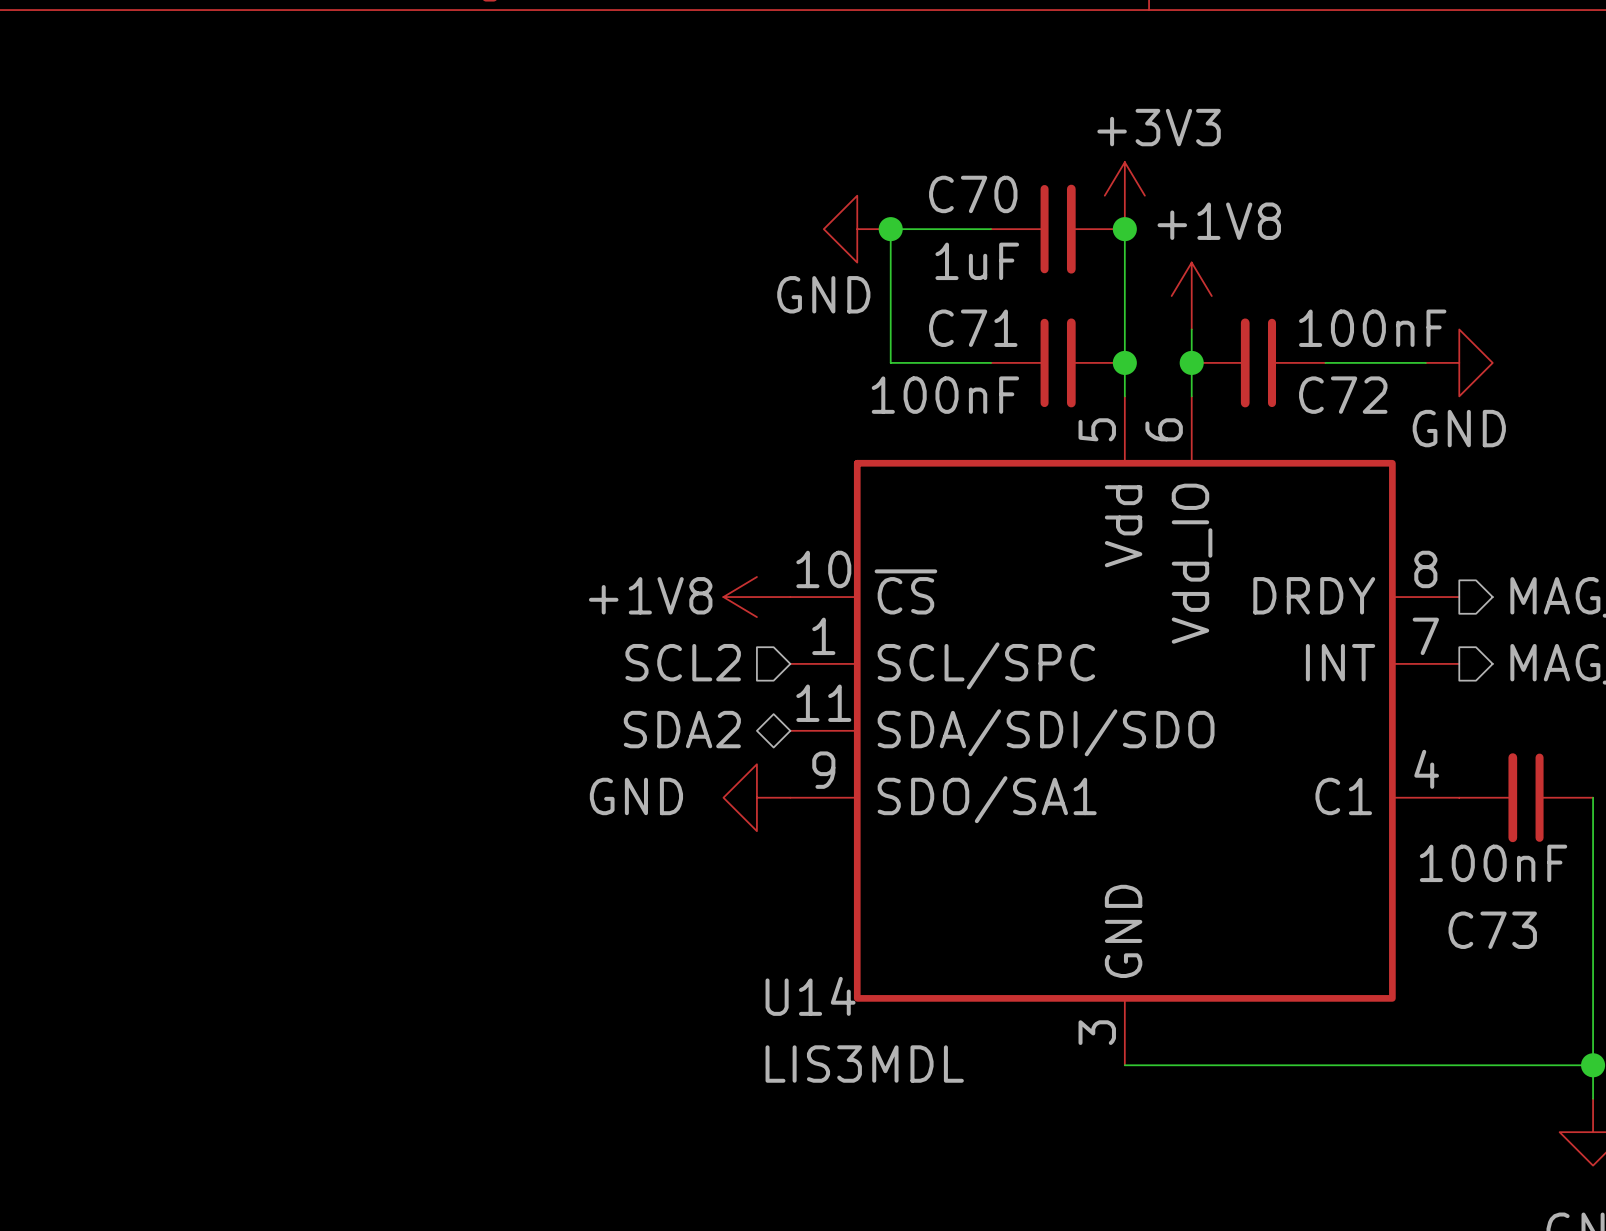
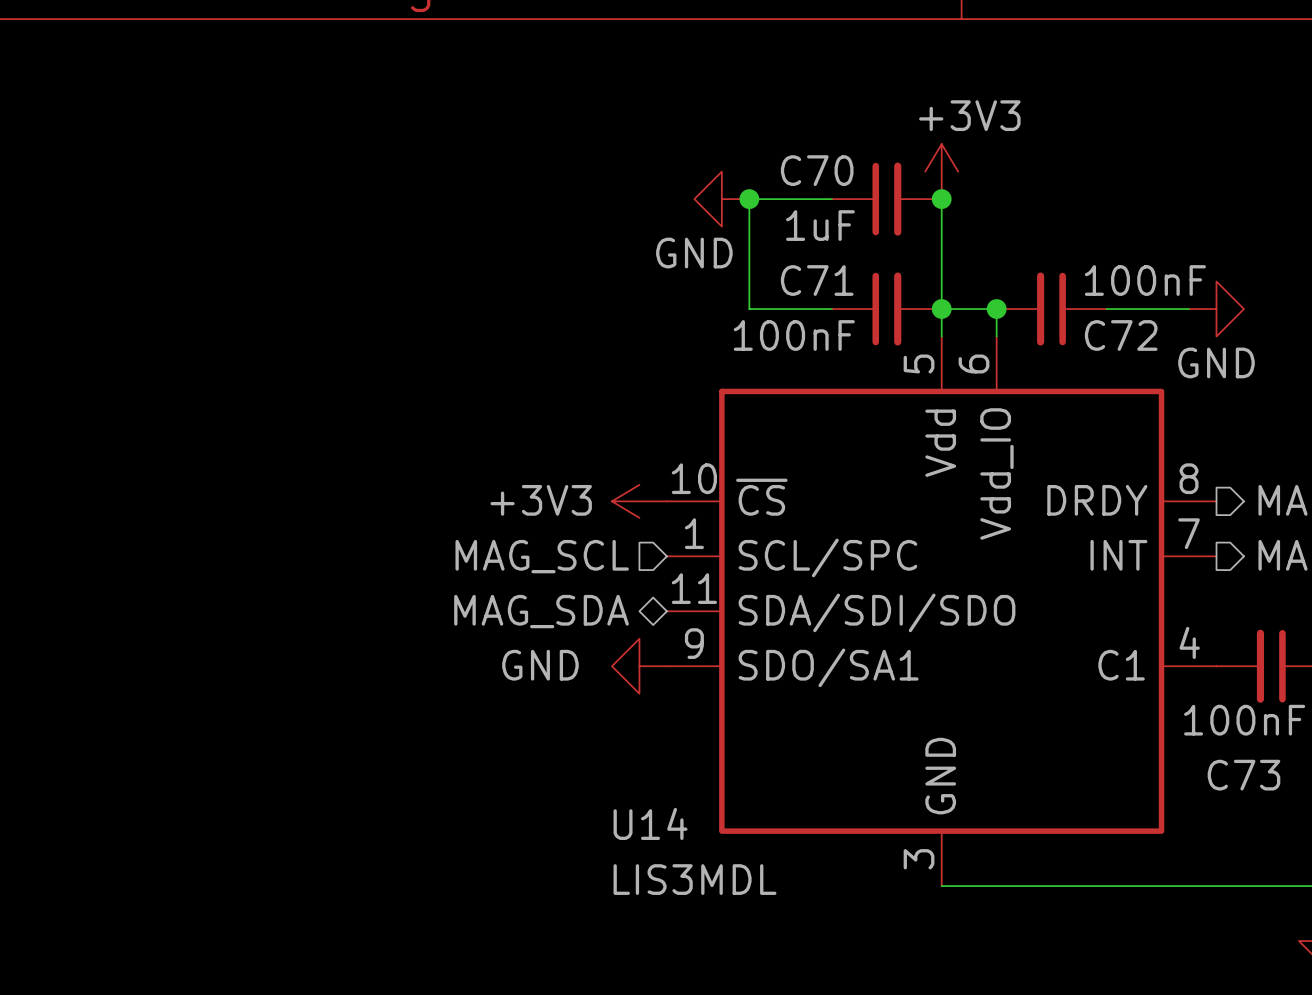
power symbol: +1V8 (1191, 296) -> none
wire: (1191, 329) (1191, 362) -> (941, 309) (996, 309)
power symbol: +1V8 (756, 597) -> +3V3 (639, 501)
hierarchical label: SCL2 (683, 662) -> MAG_SCL (542, 556)
hierarchical label: SDA2 (682, 729) -> MAG_SDA (541, 611)
U14 name position: U14 (810, 996) -> U14 (650, 823)
U14 value position: LIS3MDL (864, 1064) -> LIS3MDL (695, 879)

